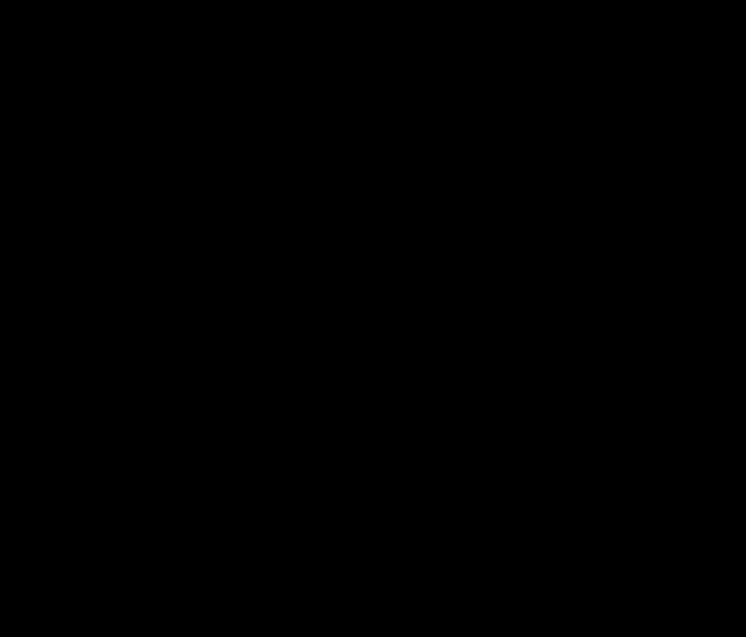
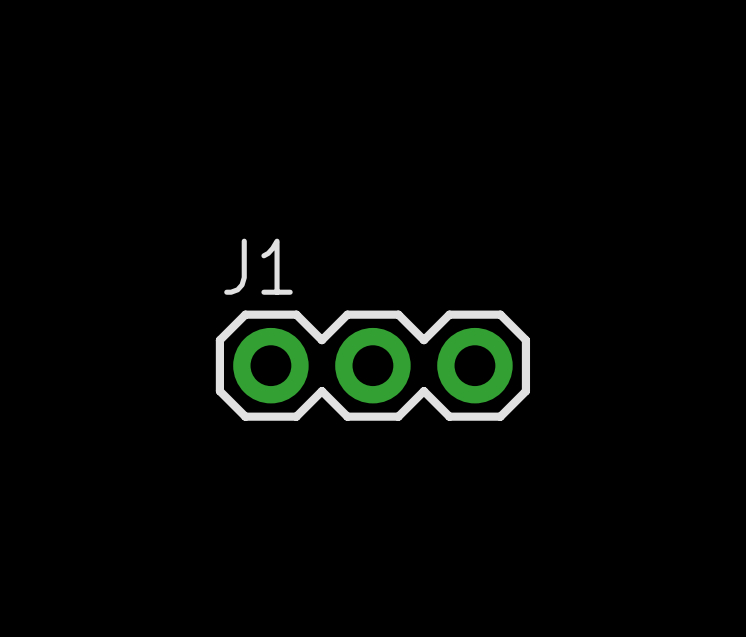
J1: none -> (372, 365)

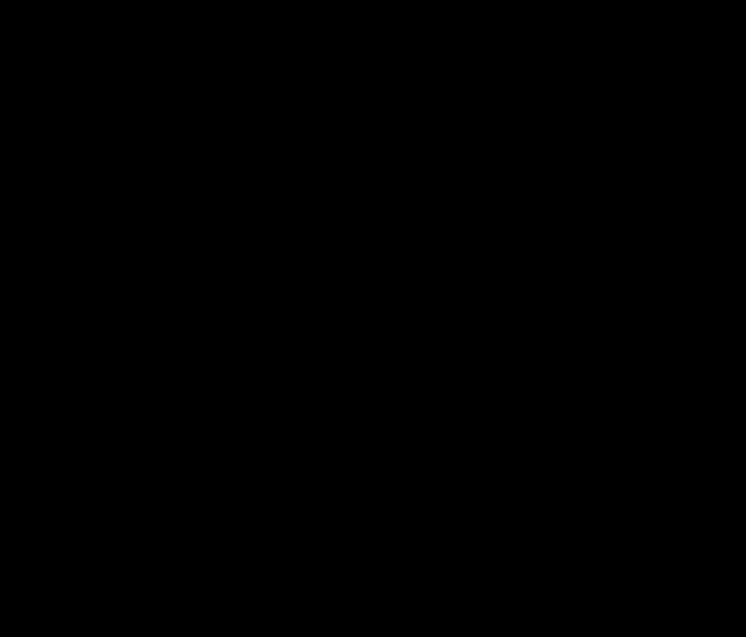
J1: (372, 365) -> none

